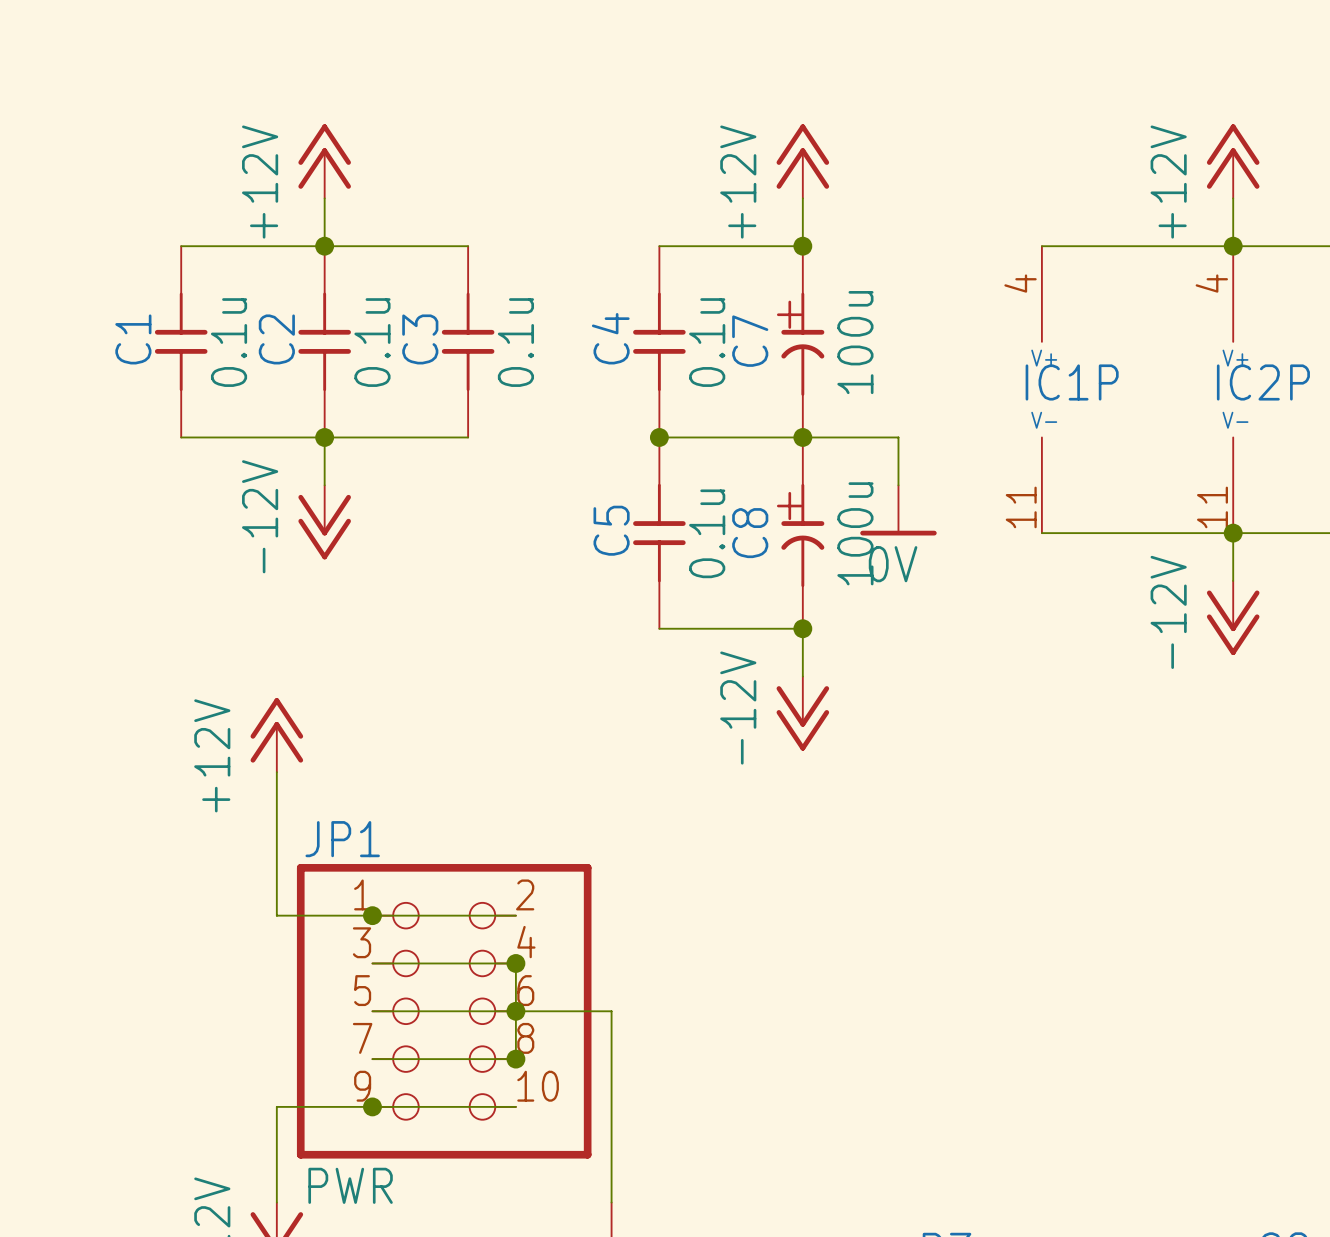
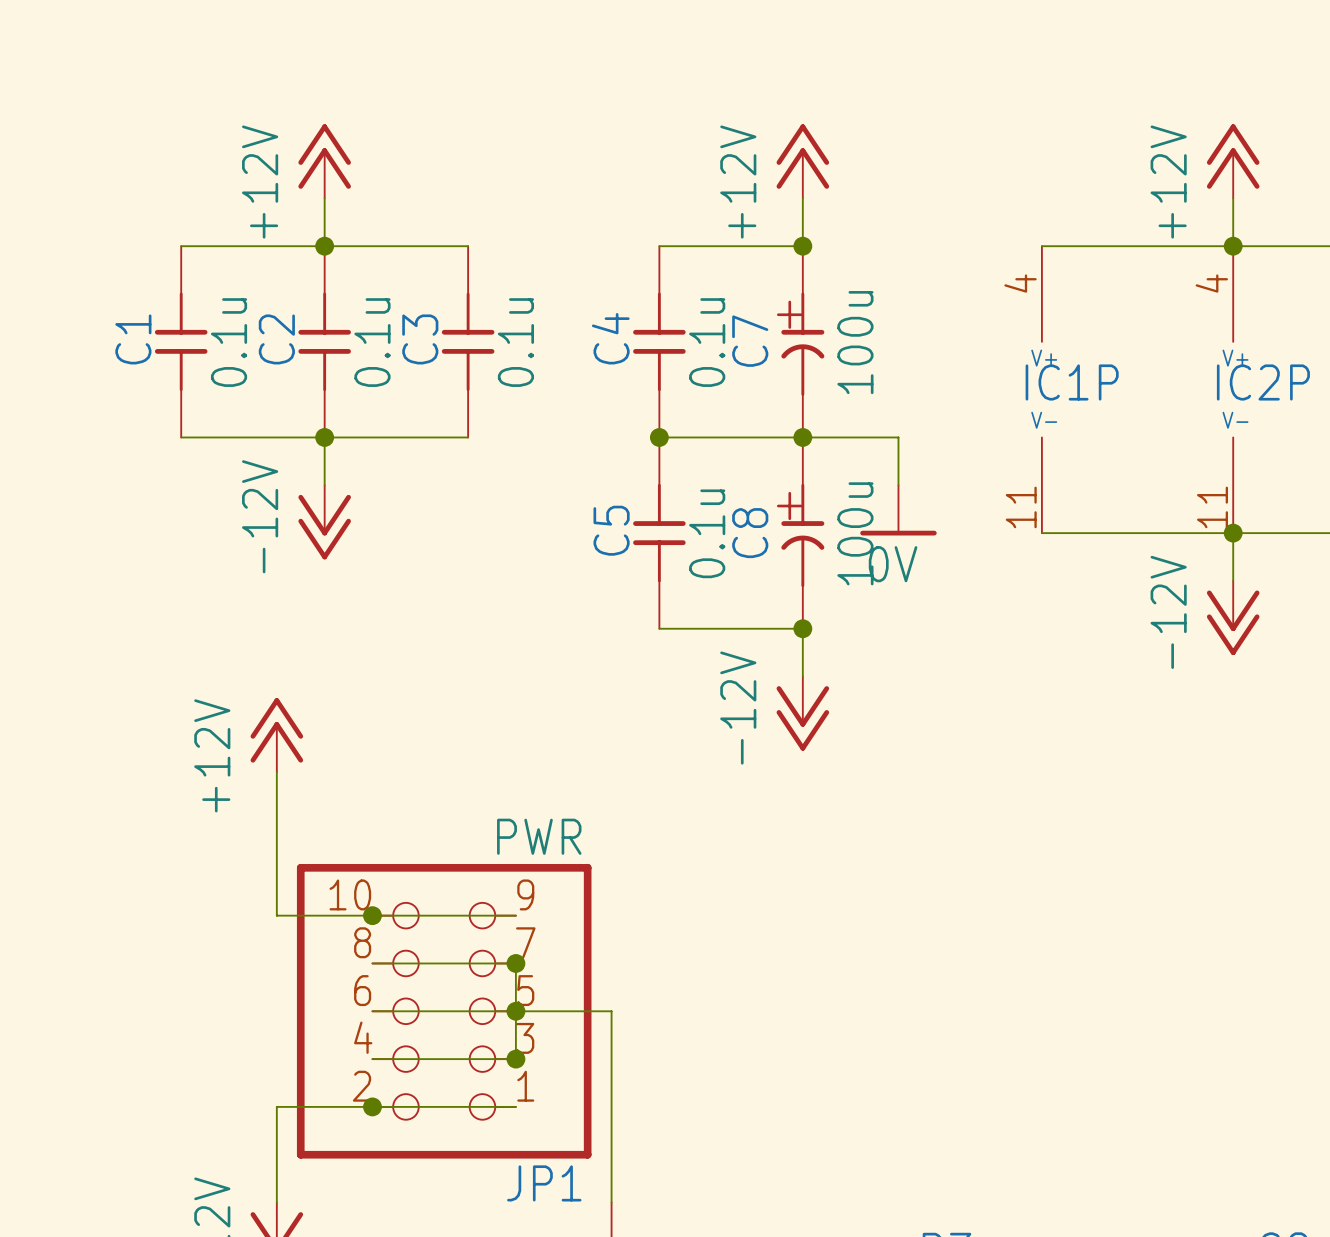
JP1 rotation: 0° (444, 1011) -> 180° (444, 1011)

